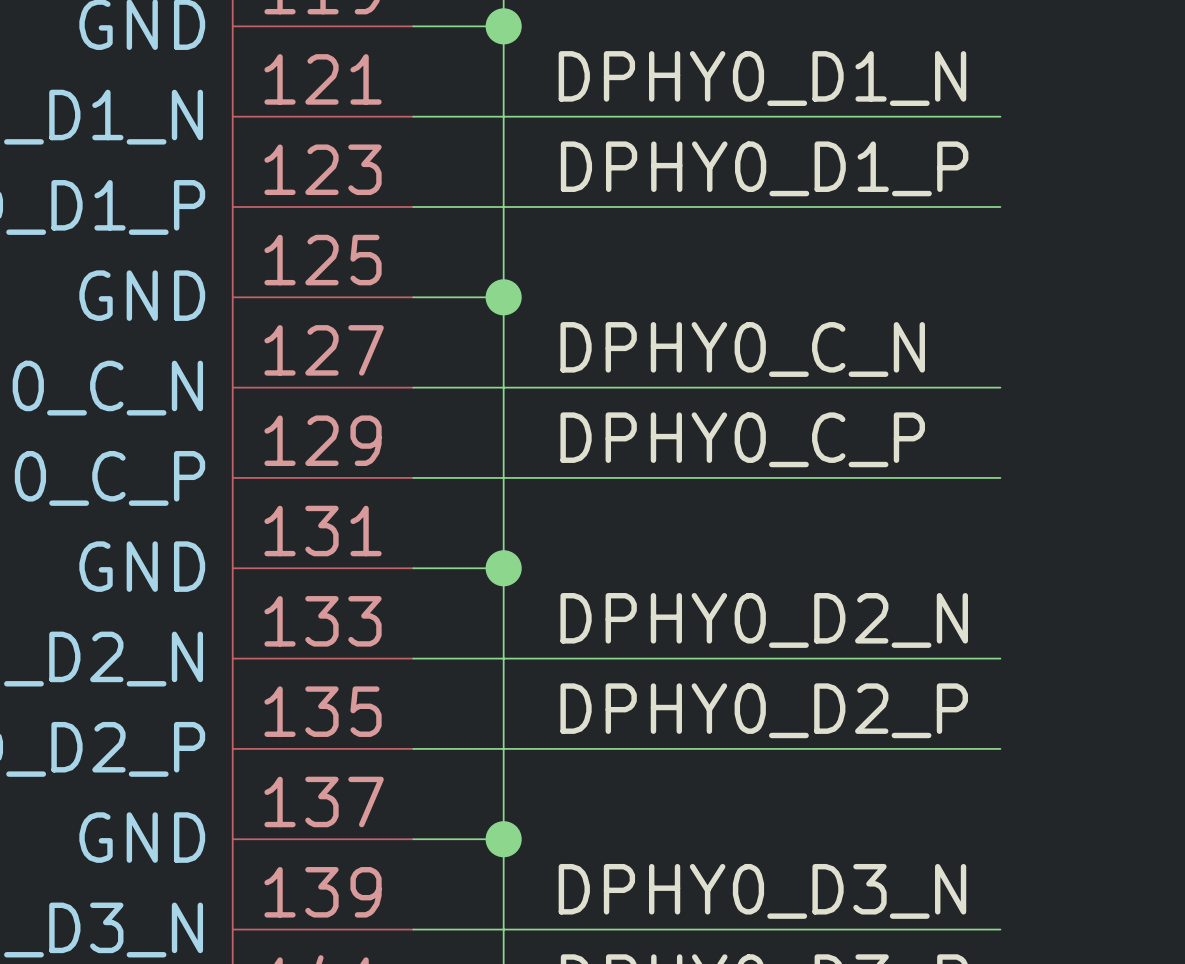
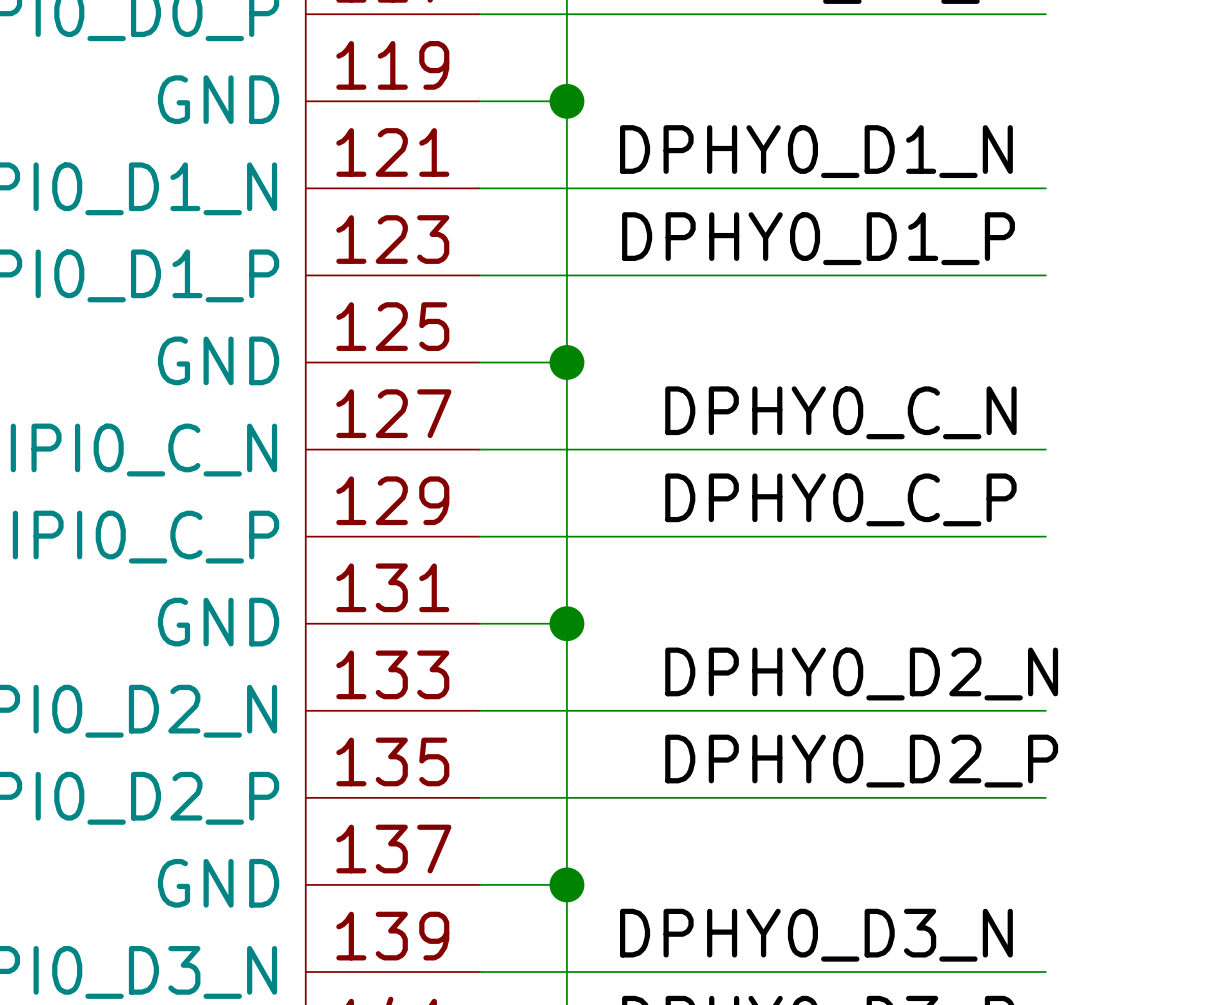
label position: DPHY0_C_N (742, 349) -> DPHY0_C_N (840, 412)
label position: DPHY0_C_P (742, 439) -> DPHY0_C_P (840, 499)
label position: DPHY0_D2_N (764, 620) -> DPHY0_D2_N (861, 674)
label position: DPHY0_D2_P (764, 710) -> DPHY0_D2_P (861, 761)

